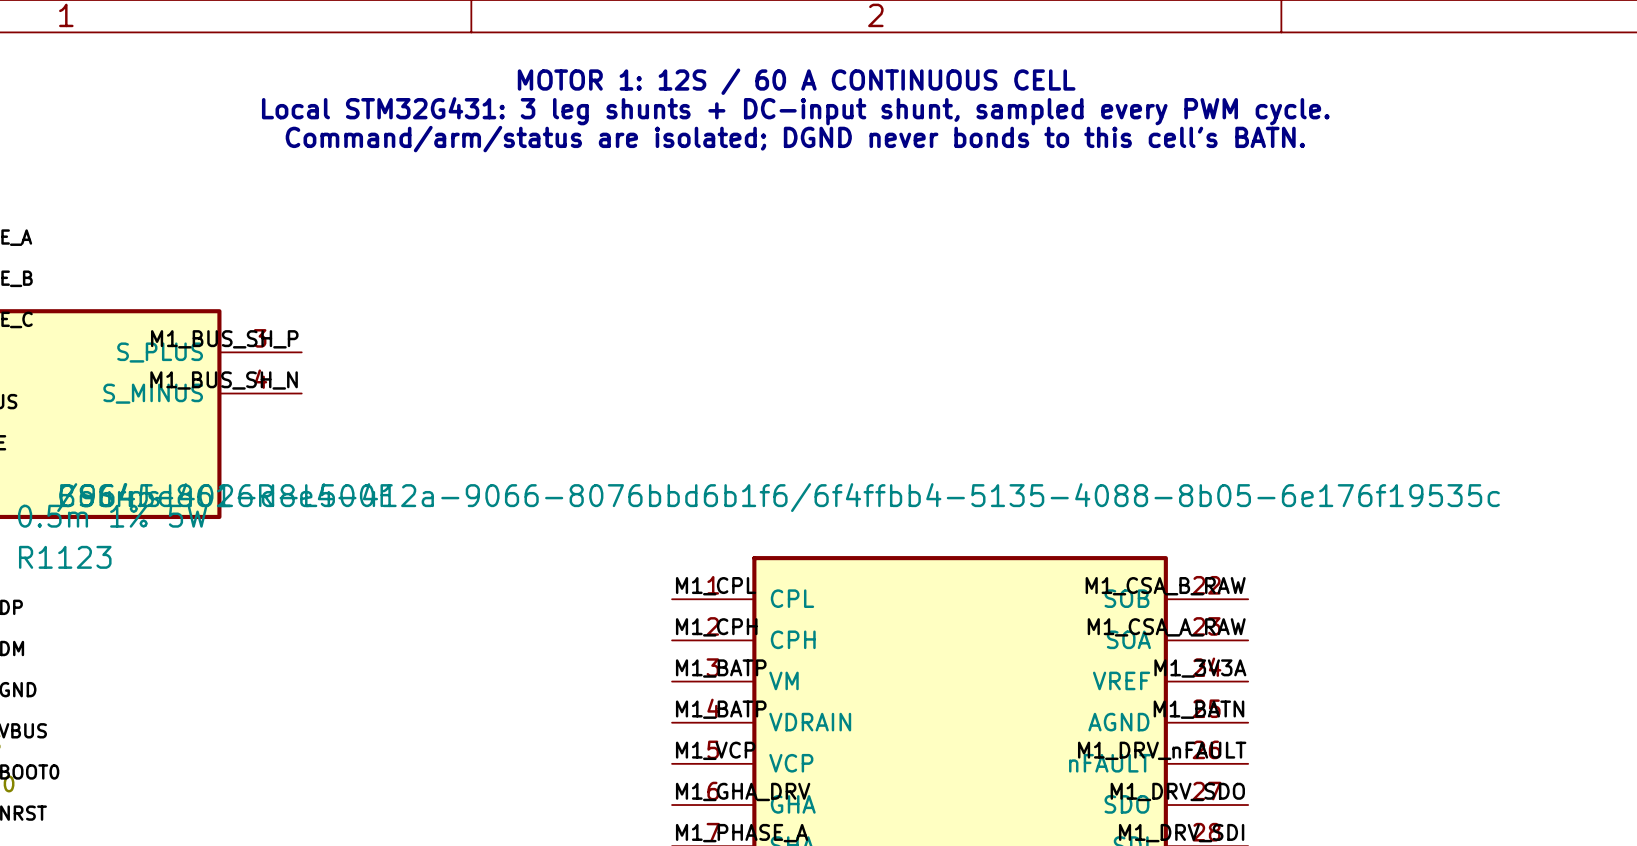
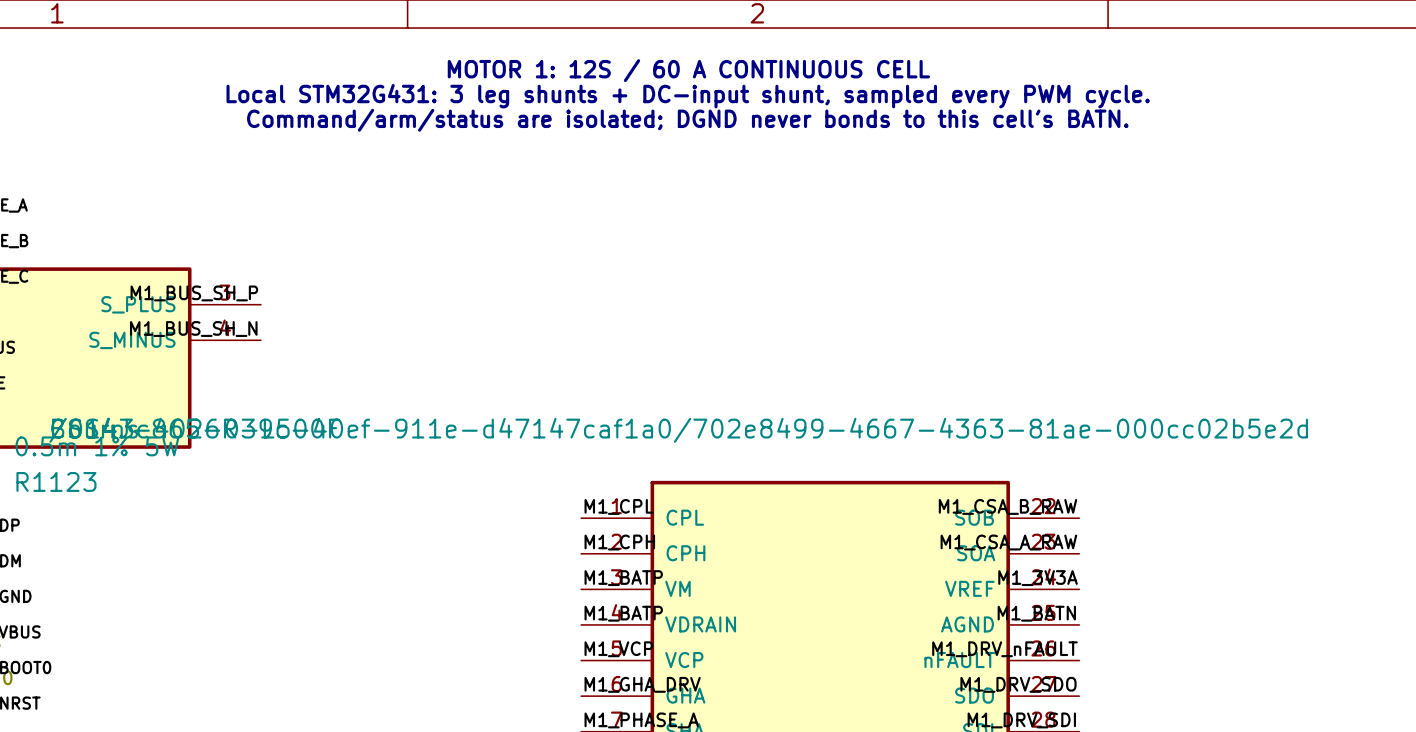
R1123 text: /9645d861-d8e4-412a-9066-8076bbd6b1f6/6f4ffbb4-5135-4088-8b05-6e176f19535c (778, 497) -> /0143c865-039c-40ef-911e-d47147caf1a0/702e8499-4667-4363-81ae-000cc02b5e2d (678, 430)

